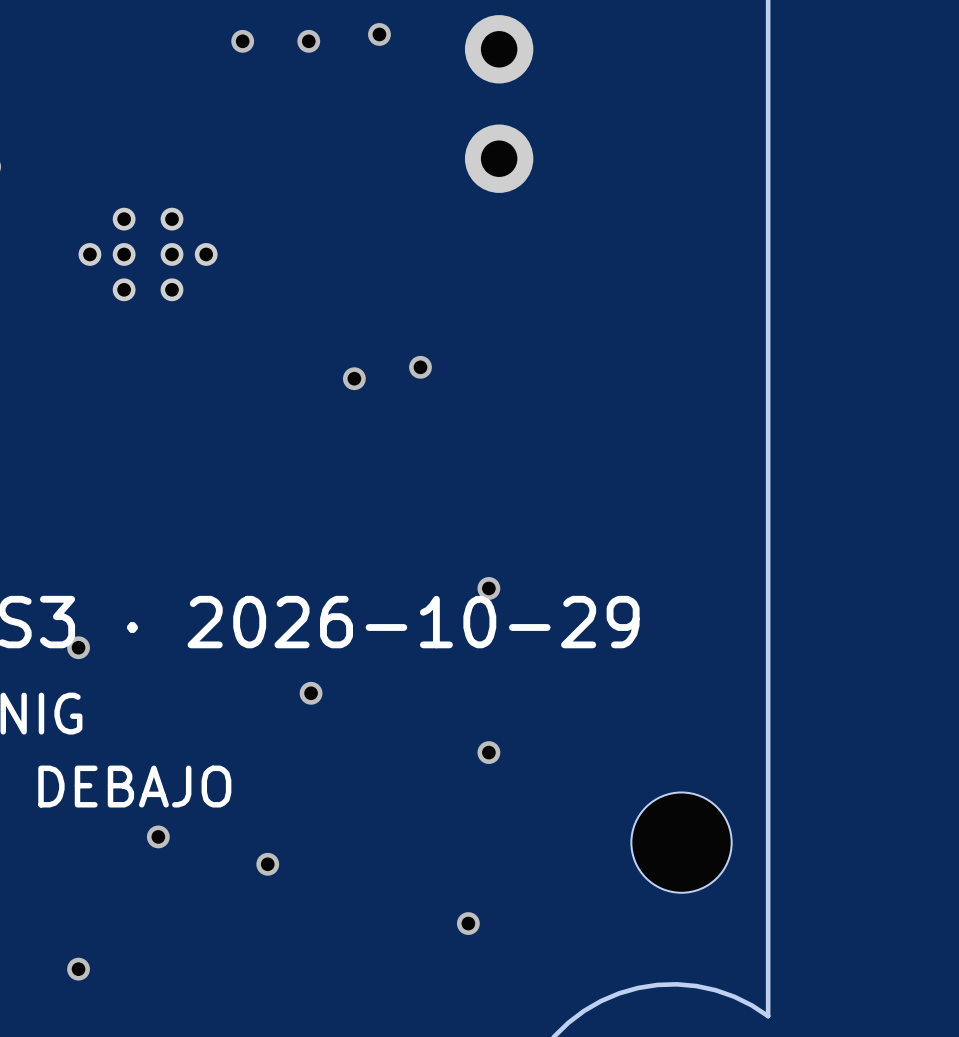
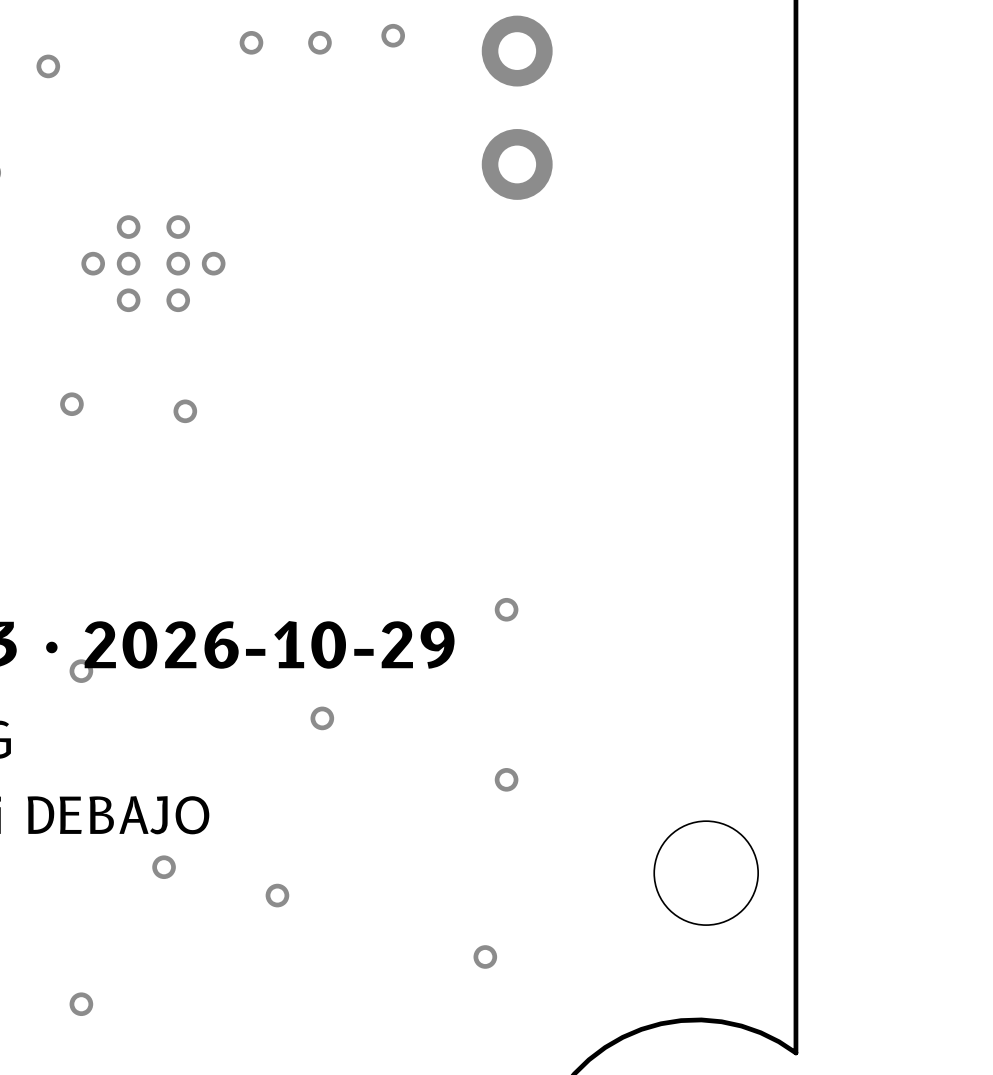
via: none -> (48, 66)
via: (420, 367) -> none
via: (354, 378) -> none
via: none -> (71, 404)
via: none -> (185, 411)

